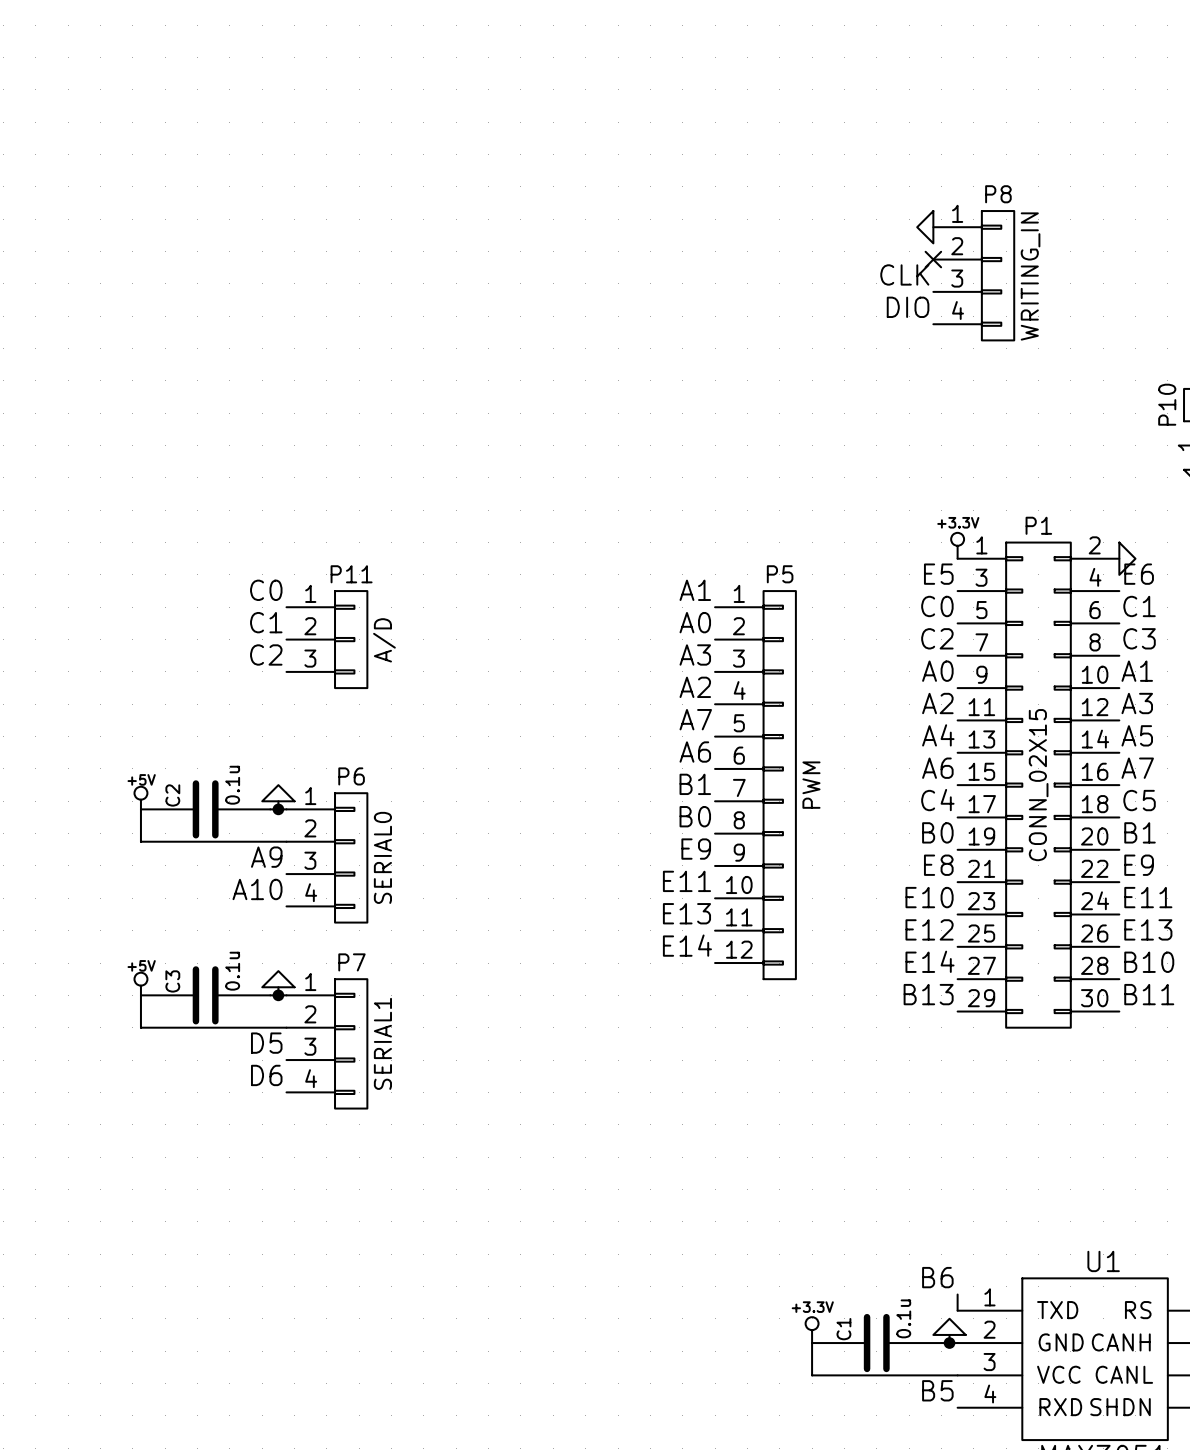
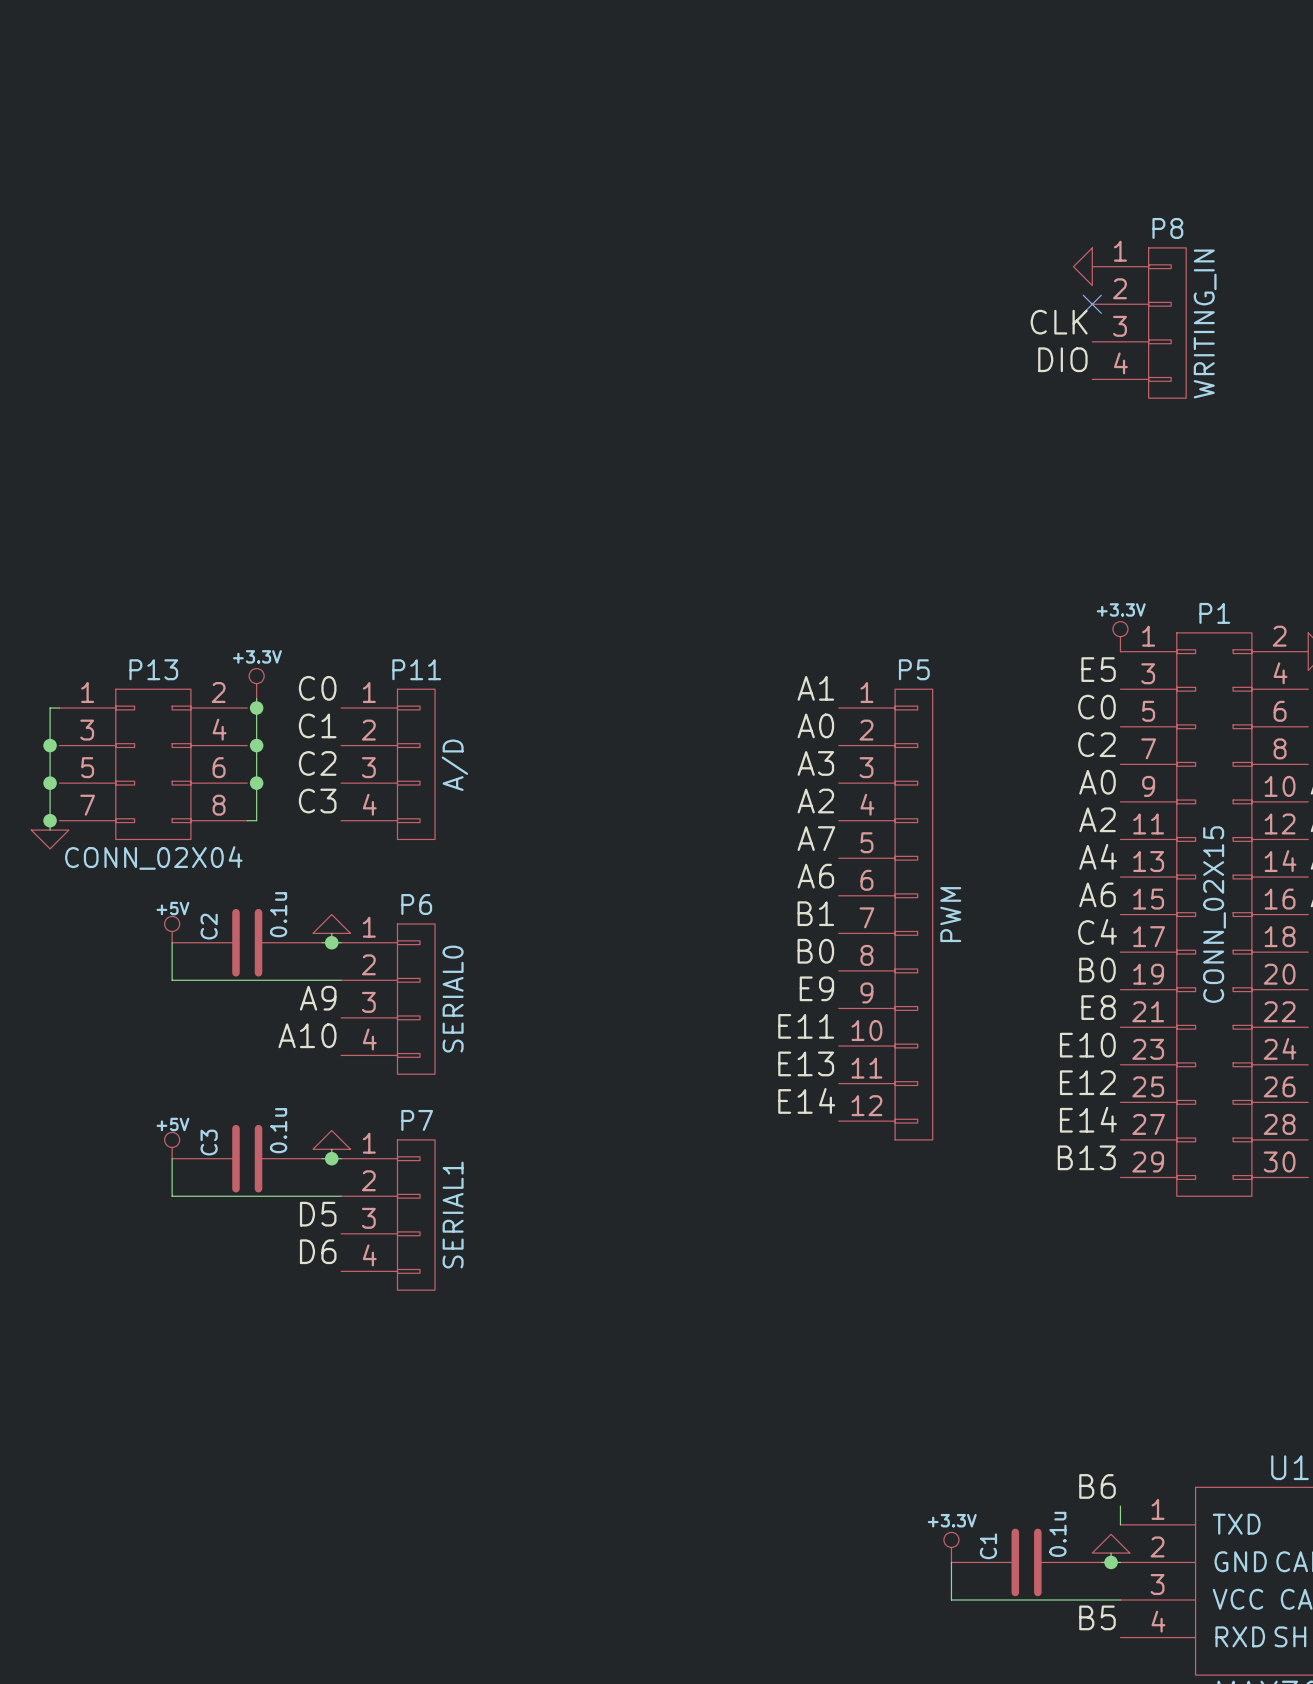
power symbol: none -> +3.3V (256, 683)
P11 symbol: [286, 591, 368, 689] -> [341, 689, 436, 840]
wire: none -> (256, 698) (256, 820) (247, 820)
wire: none -> (59, 708) (50, 708) (50, 830)
junction: none -> (256, 708)
junction: none -> (50, 745)
junction: none -> (256, 745)
P13: none -> CONN_02X04 (153, 764)
junction: none -> (50, 783)
junction: none -> (256, 783)
label: none -> C3 (317, 801)
junction: none -> (50, 820)
power symbol: none -> (50, 839)

